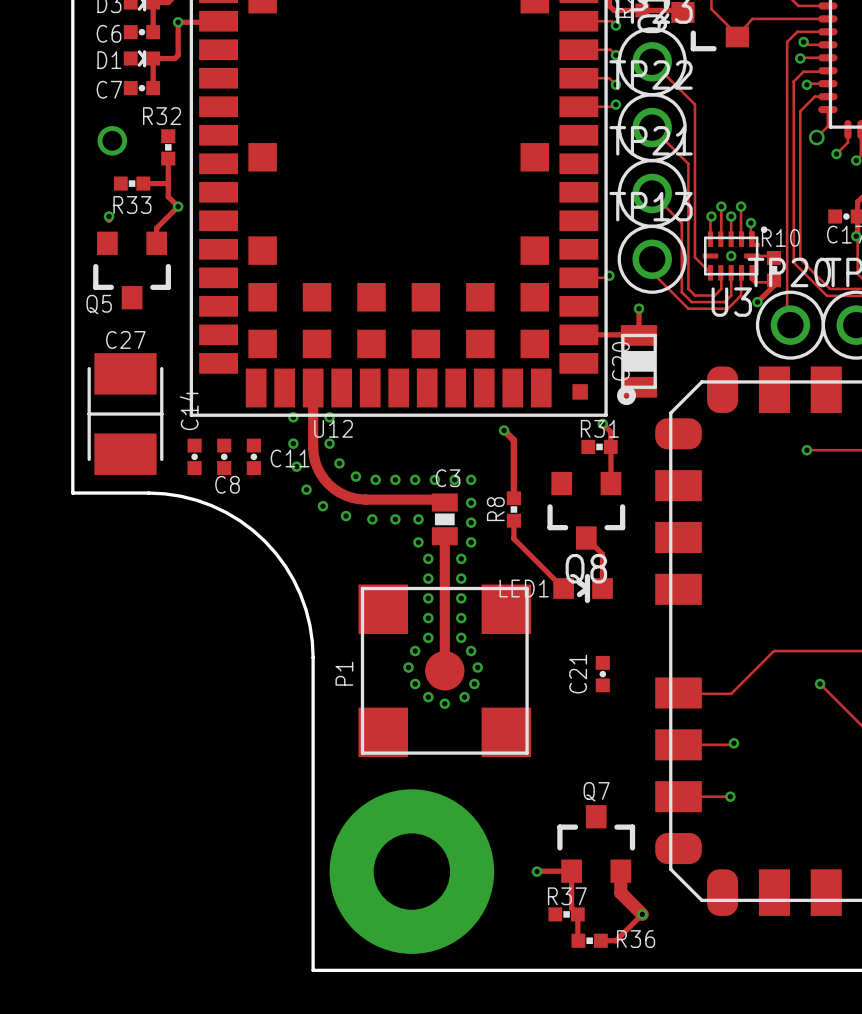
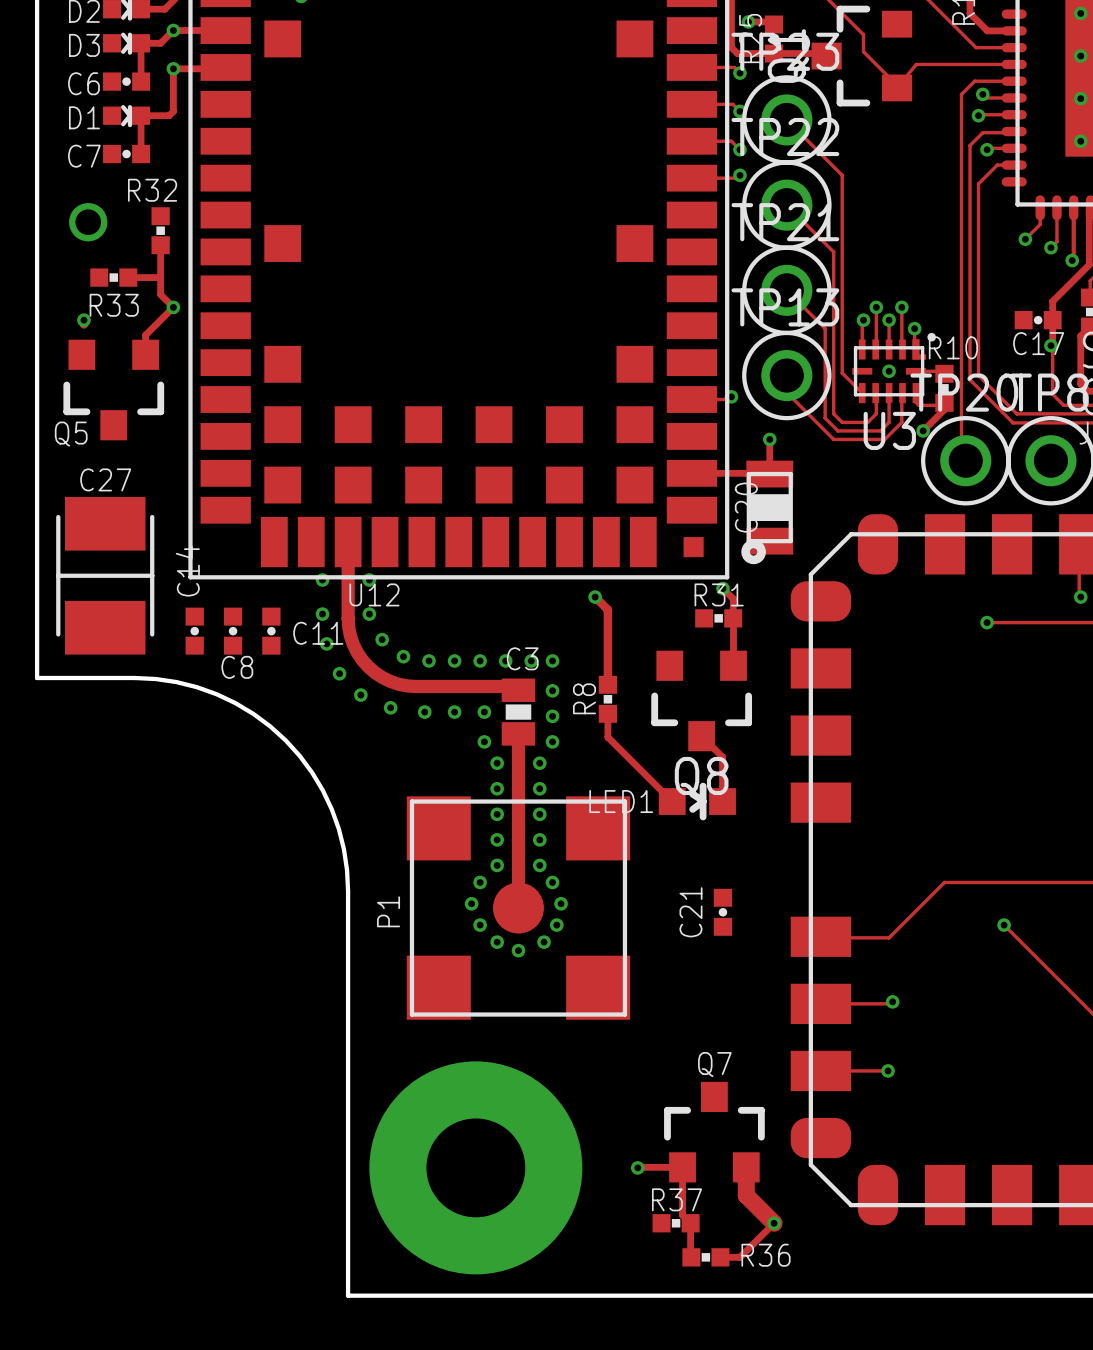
track: (827, 109) (827, 126) (816, 137) -> none
via: (816, 137) -> none

